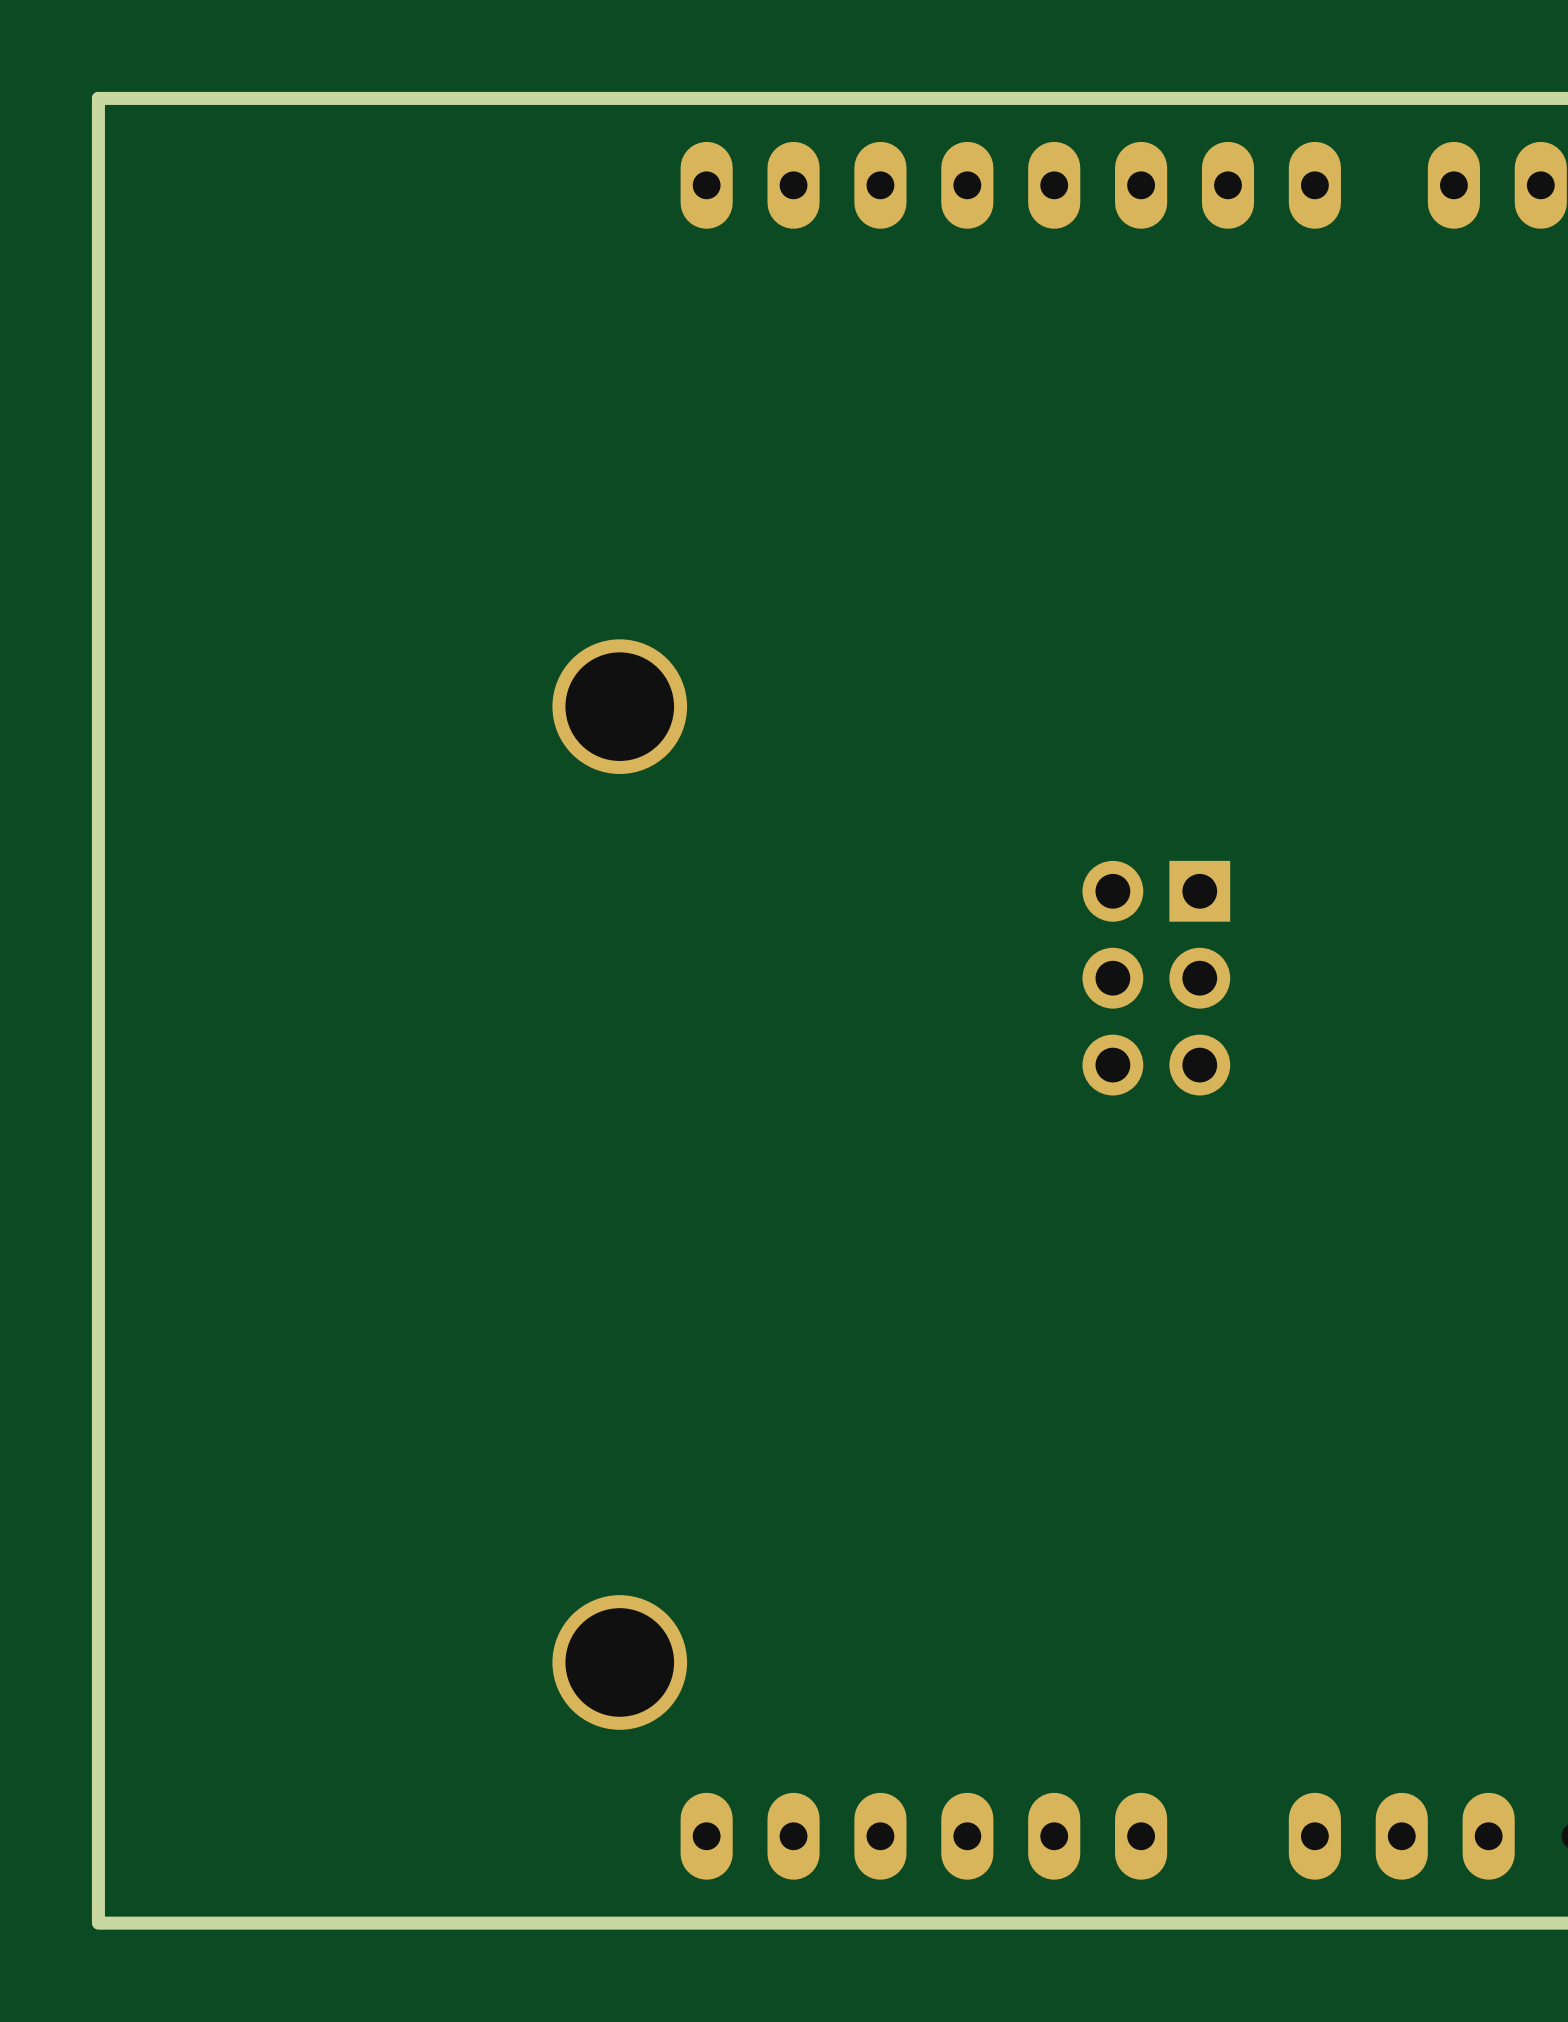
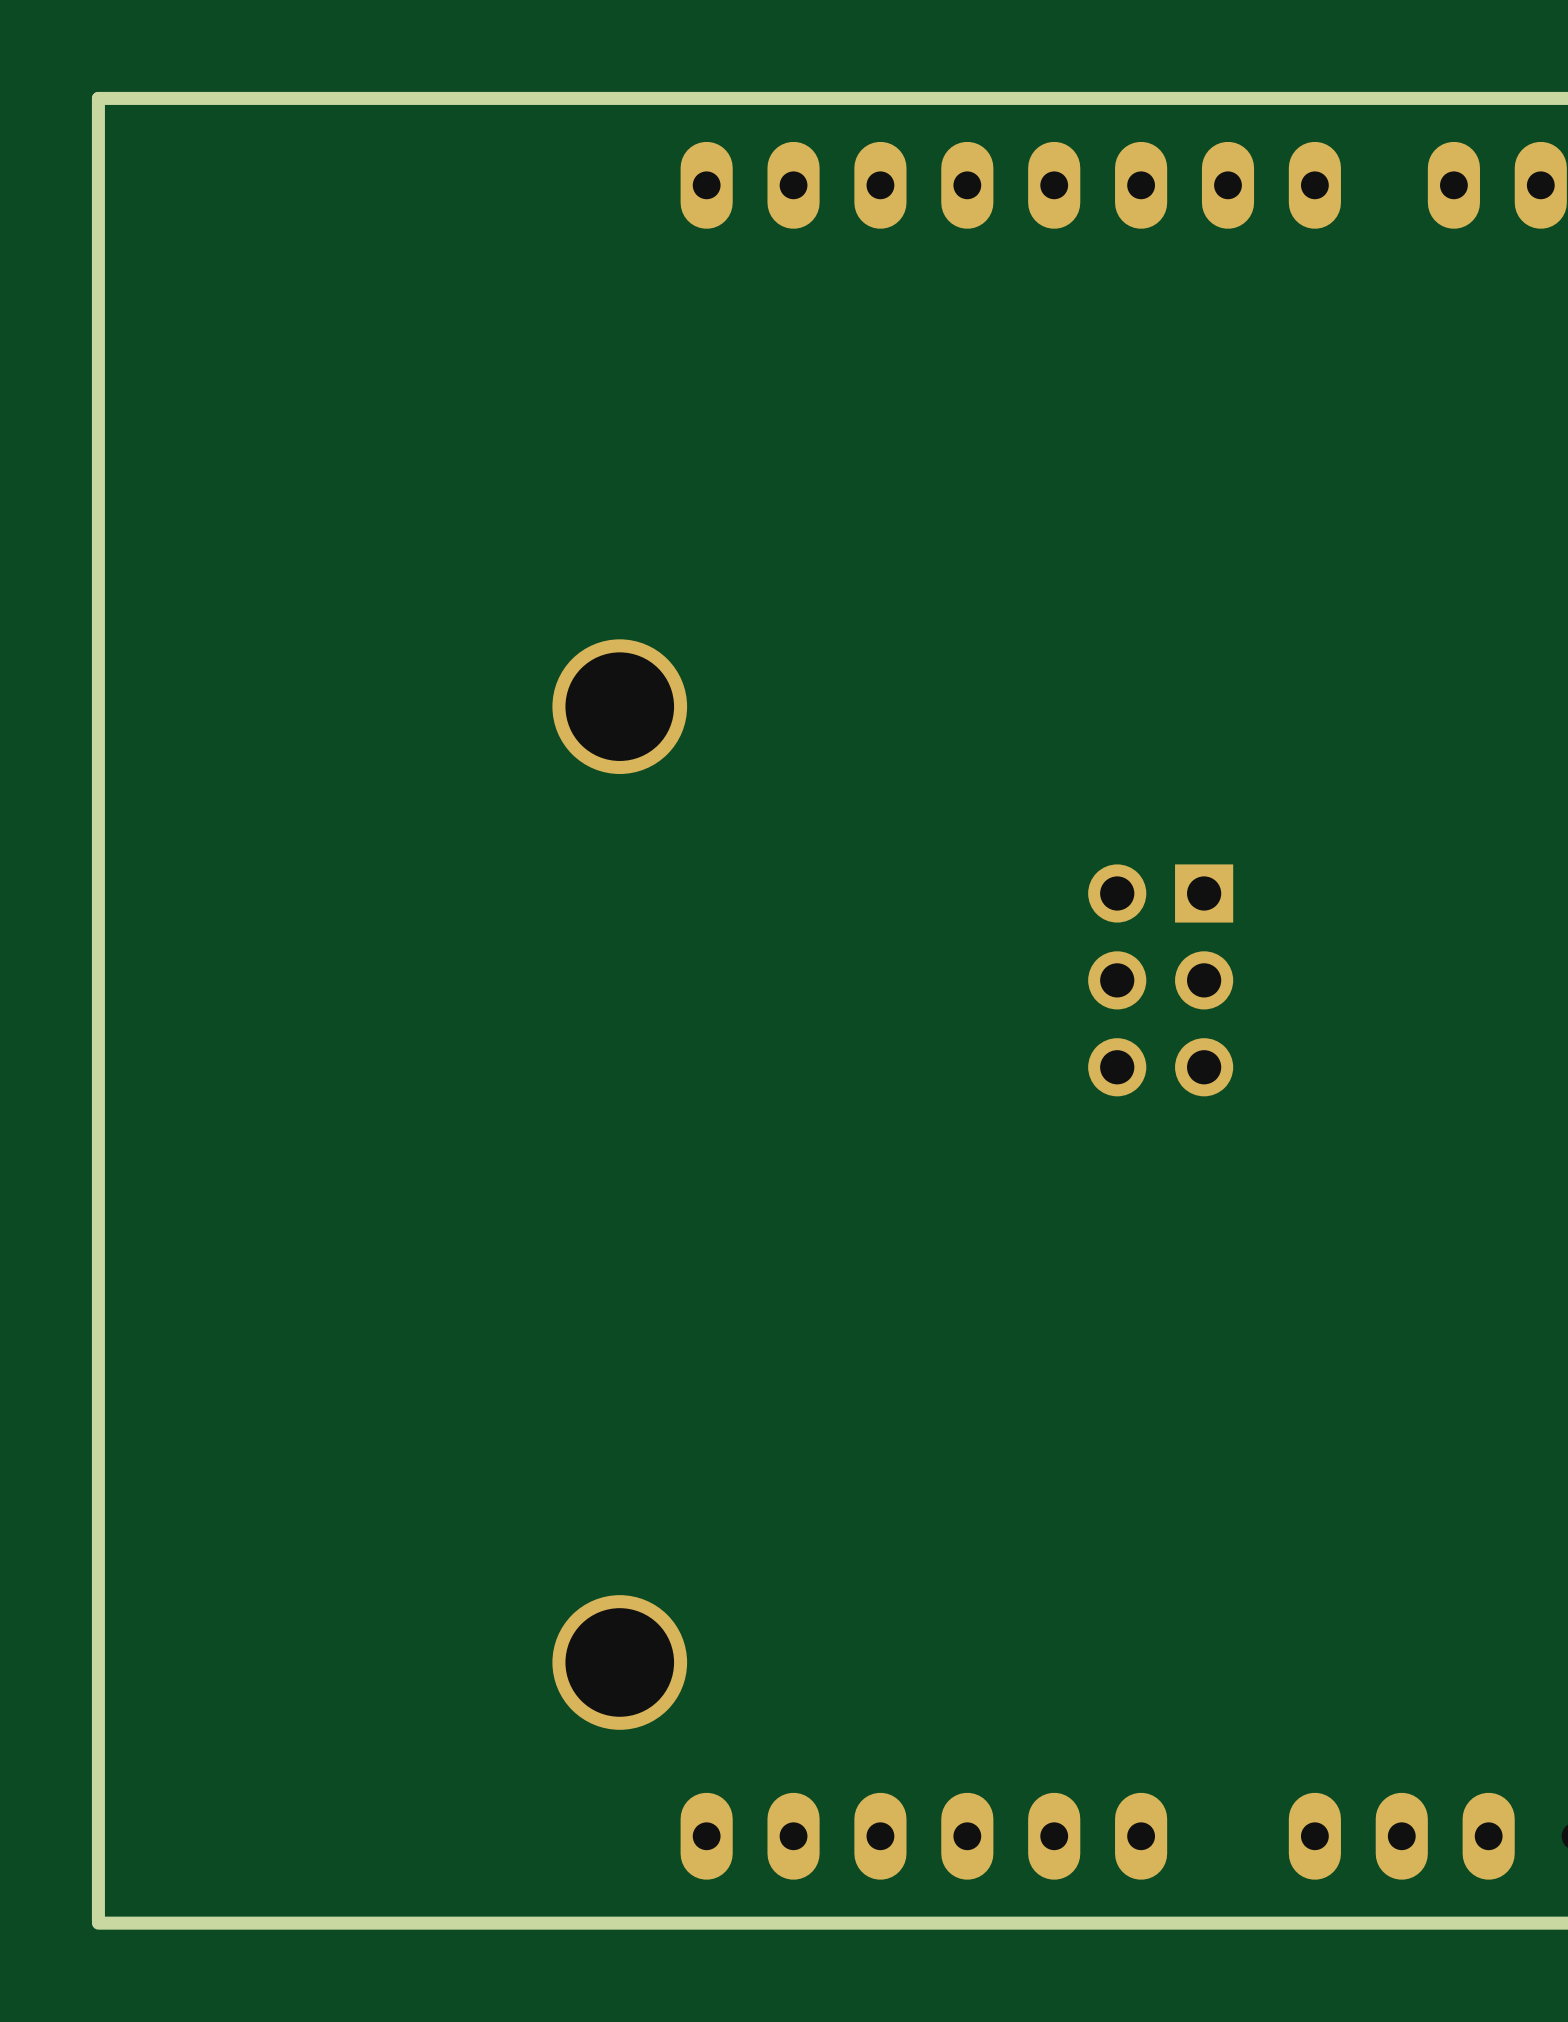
part footprint: [1082, 860, 1231, 1096] -> [1088, 864, 1234, 1097]

